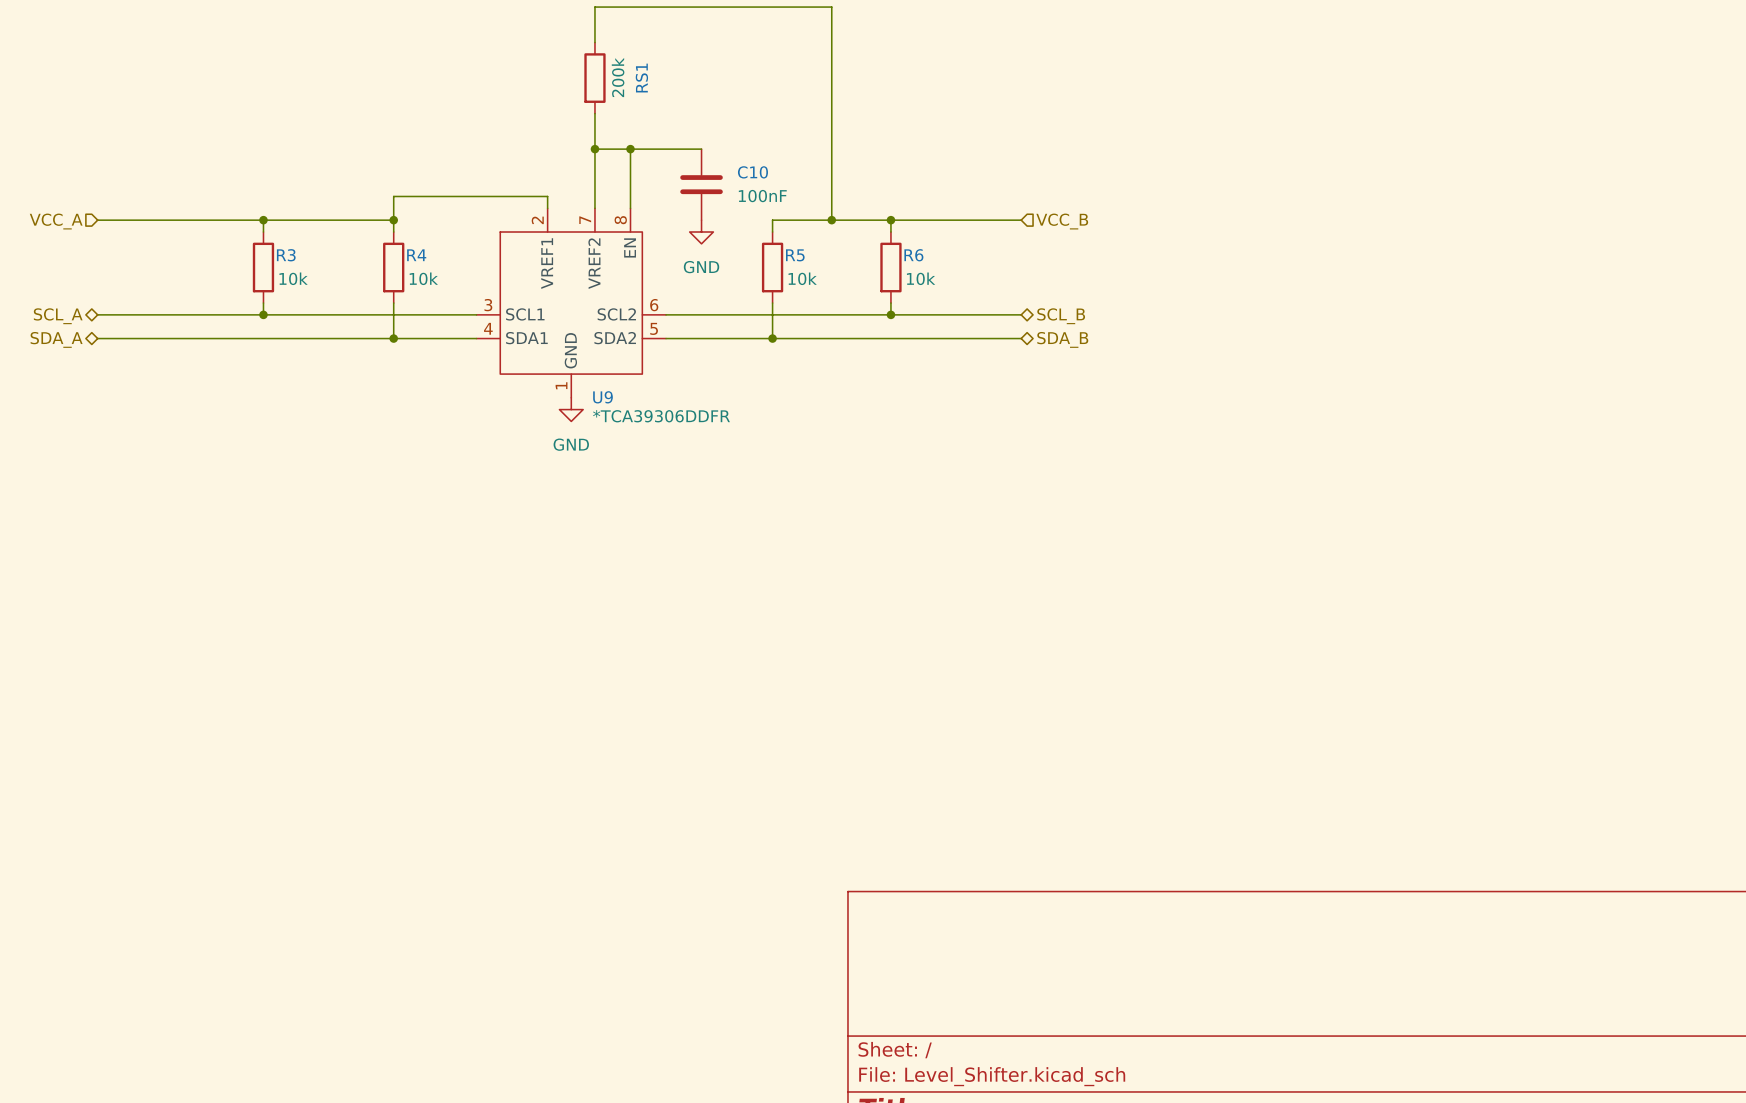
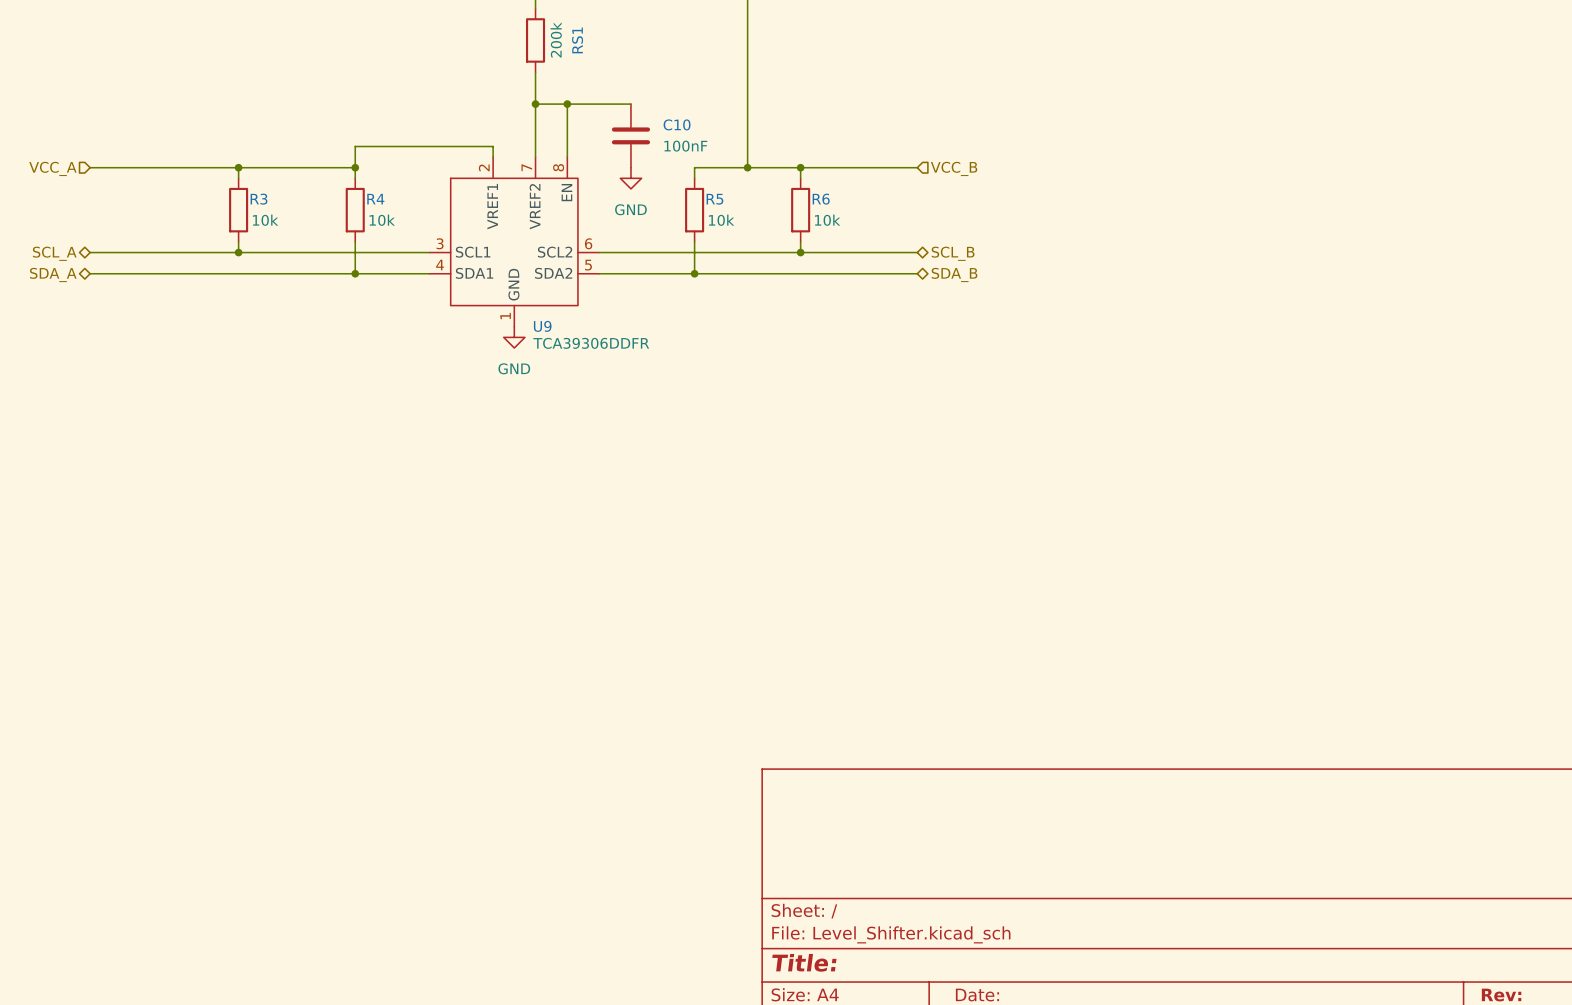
U9 value: *TCA39306DDFR (661, 416) -> TCA39306DDFR (591, 343)

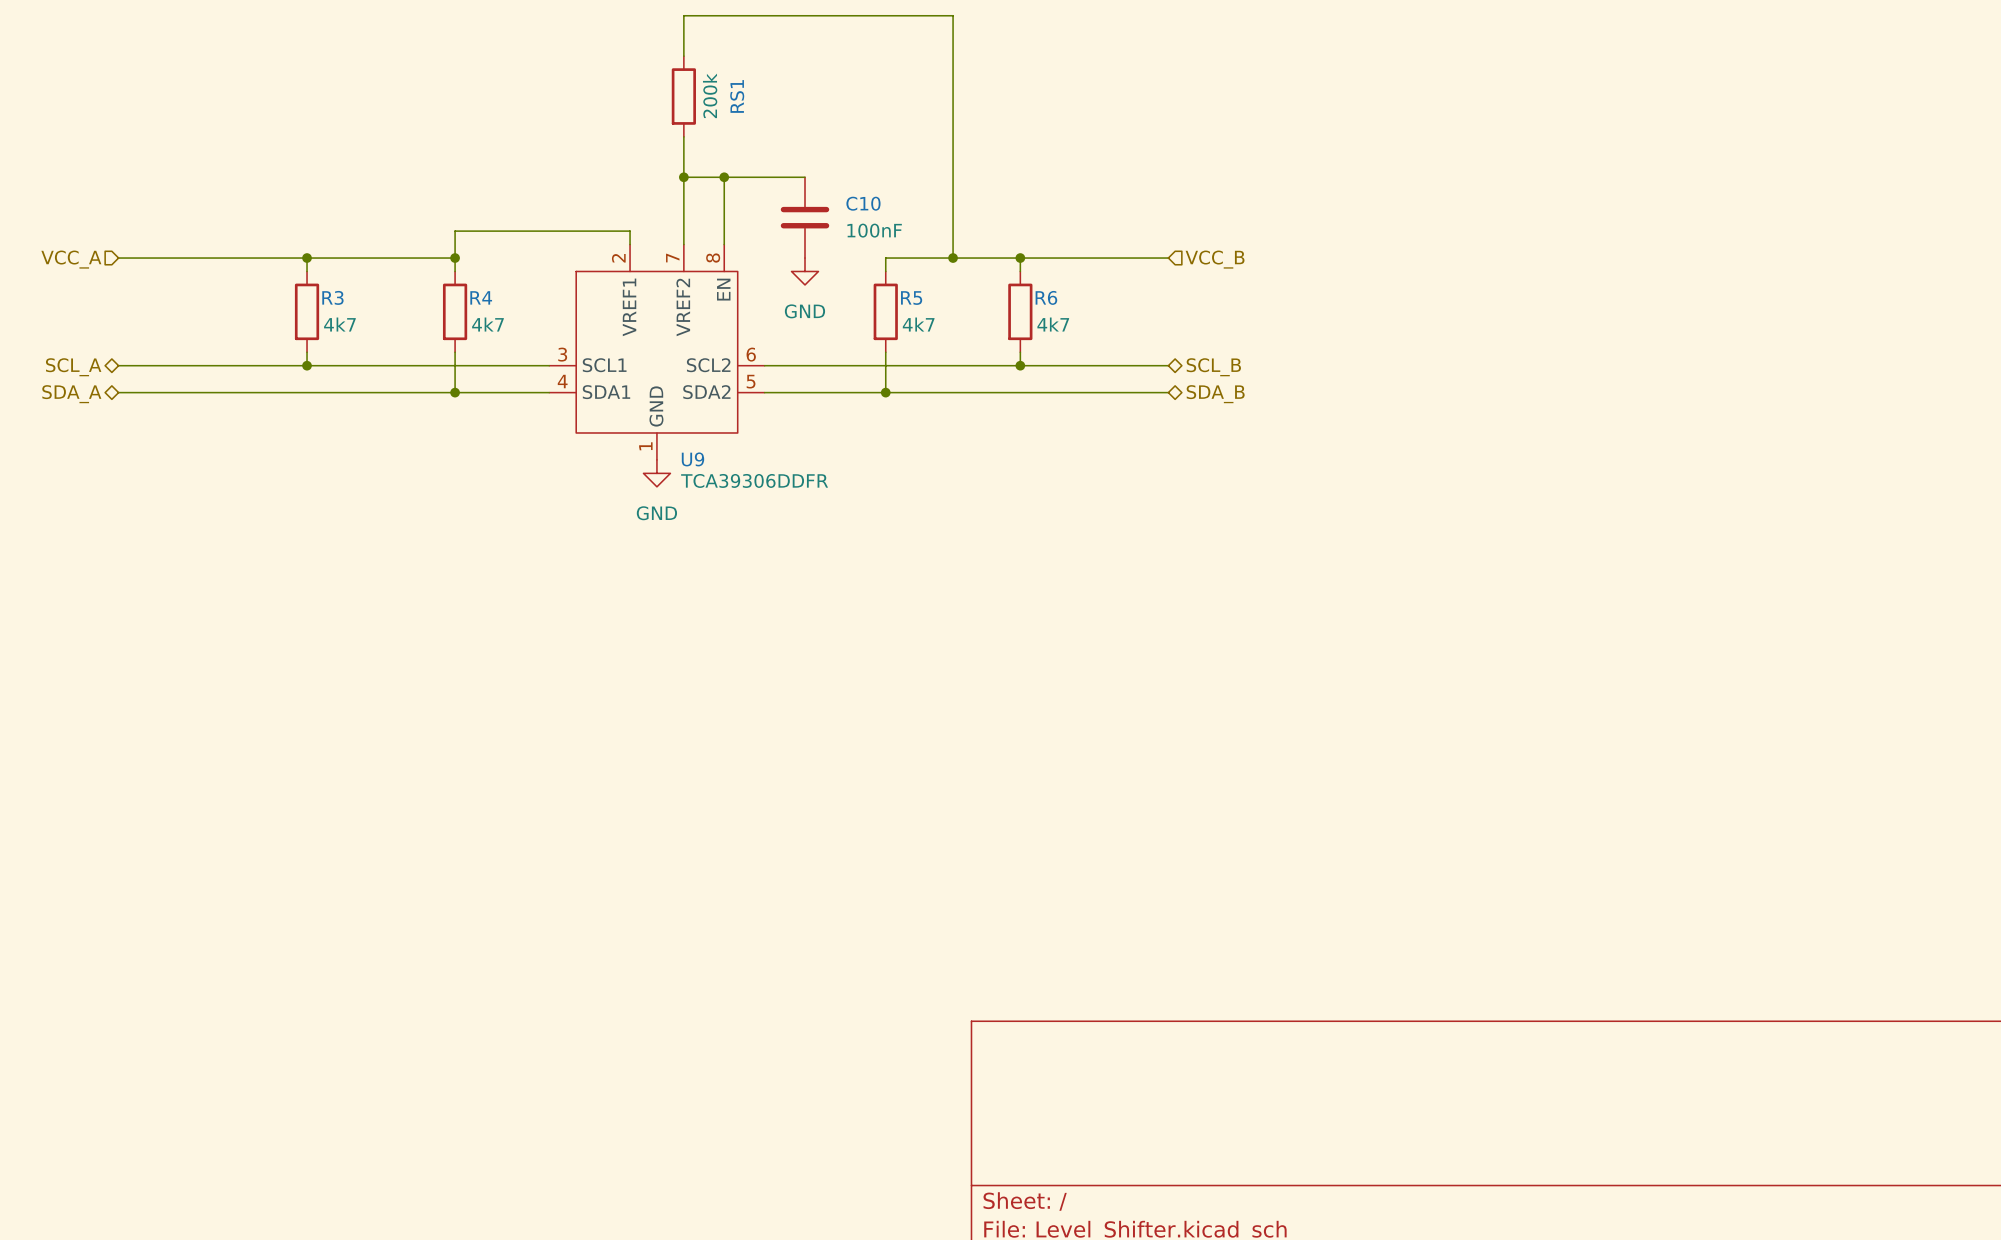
R3 value: 10k (265, 220) -> 4k7 (339, 324)
R4 value: 10k (382, 220) -> 4k7 (487, 324)
R5 value: 10k (721, 220) -> 4k7 (918, 324)
R6 value: 10k (827, 220) -> 4k7 (1053, 324)

